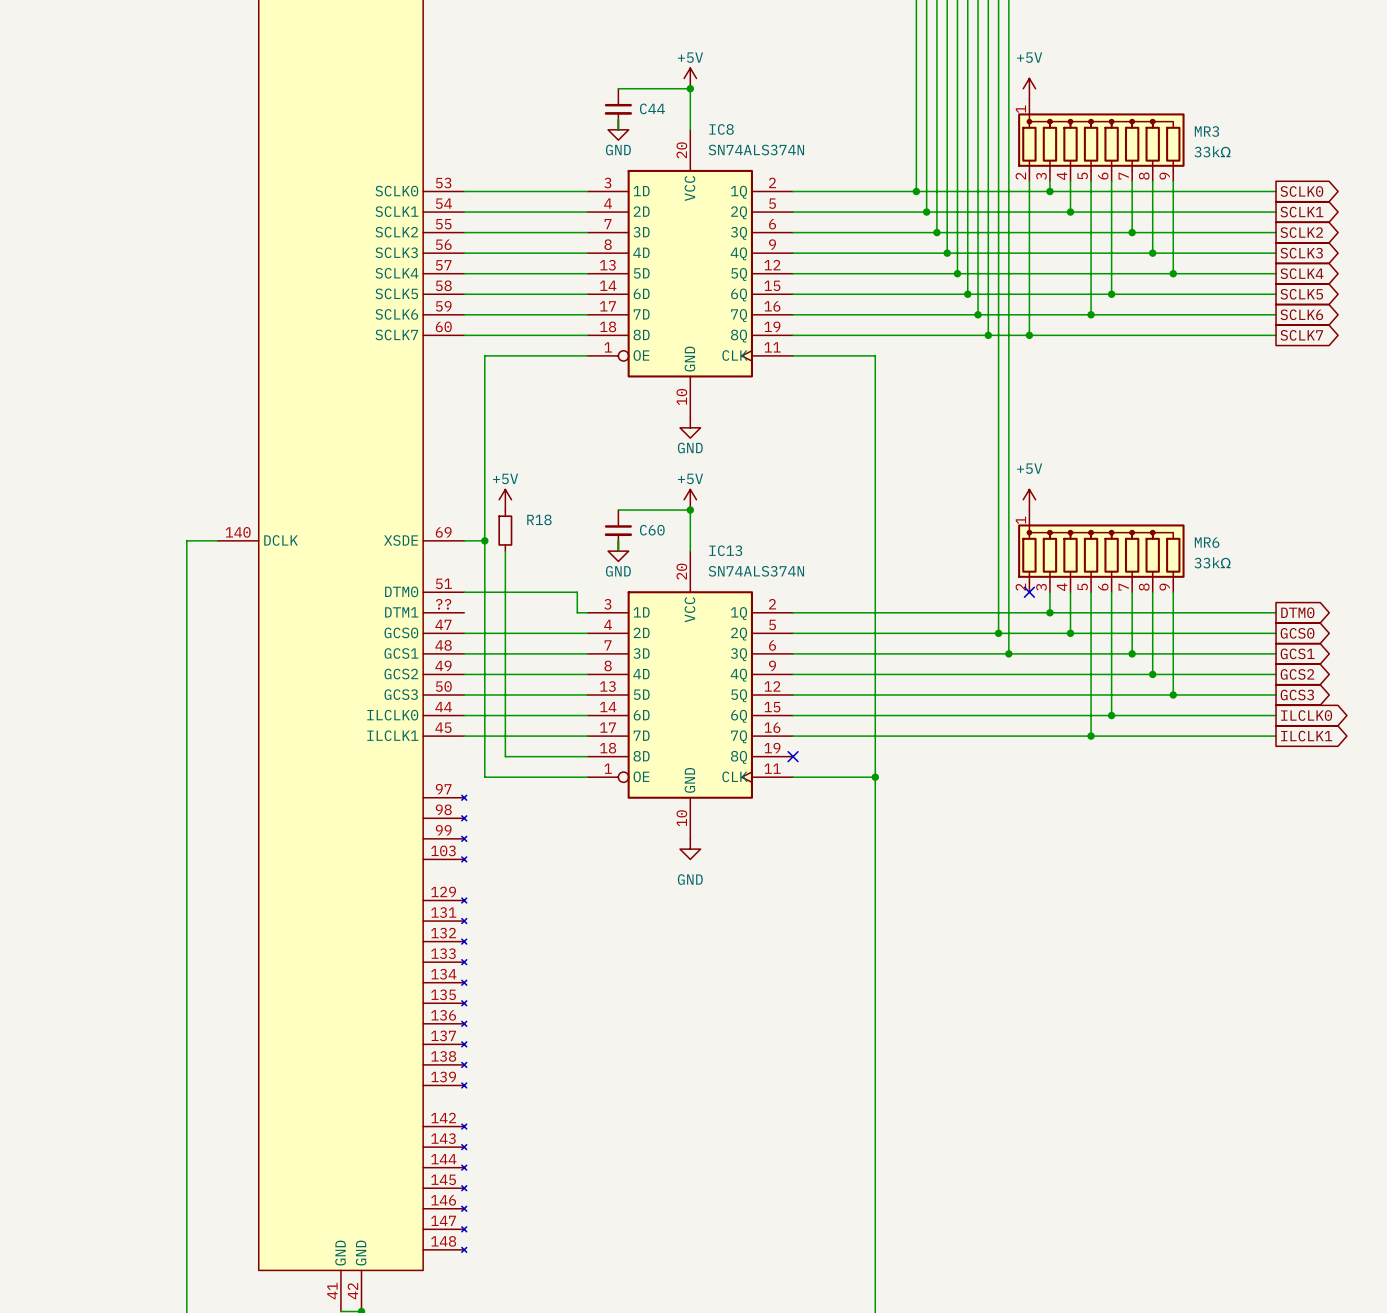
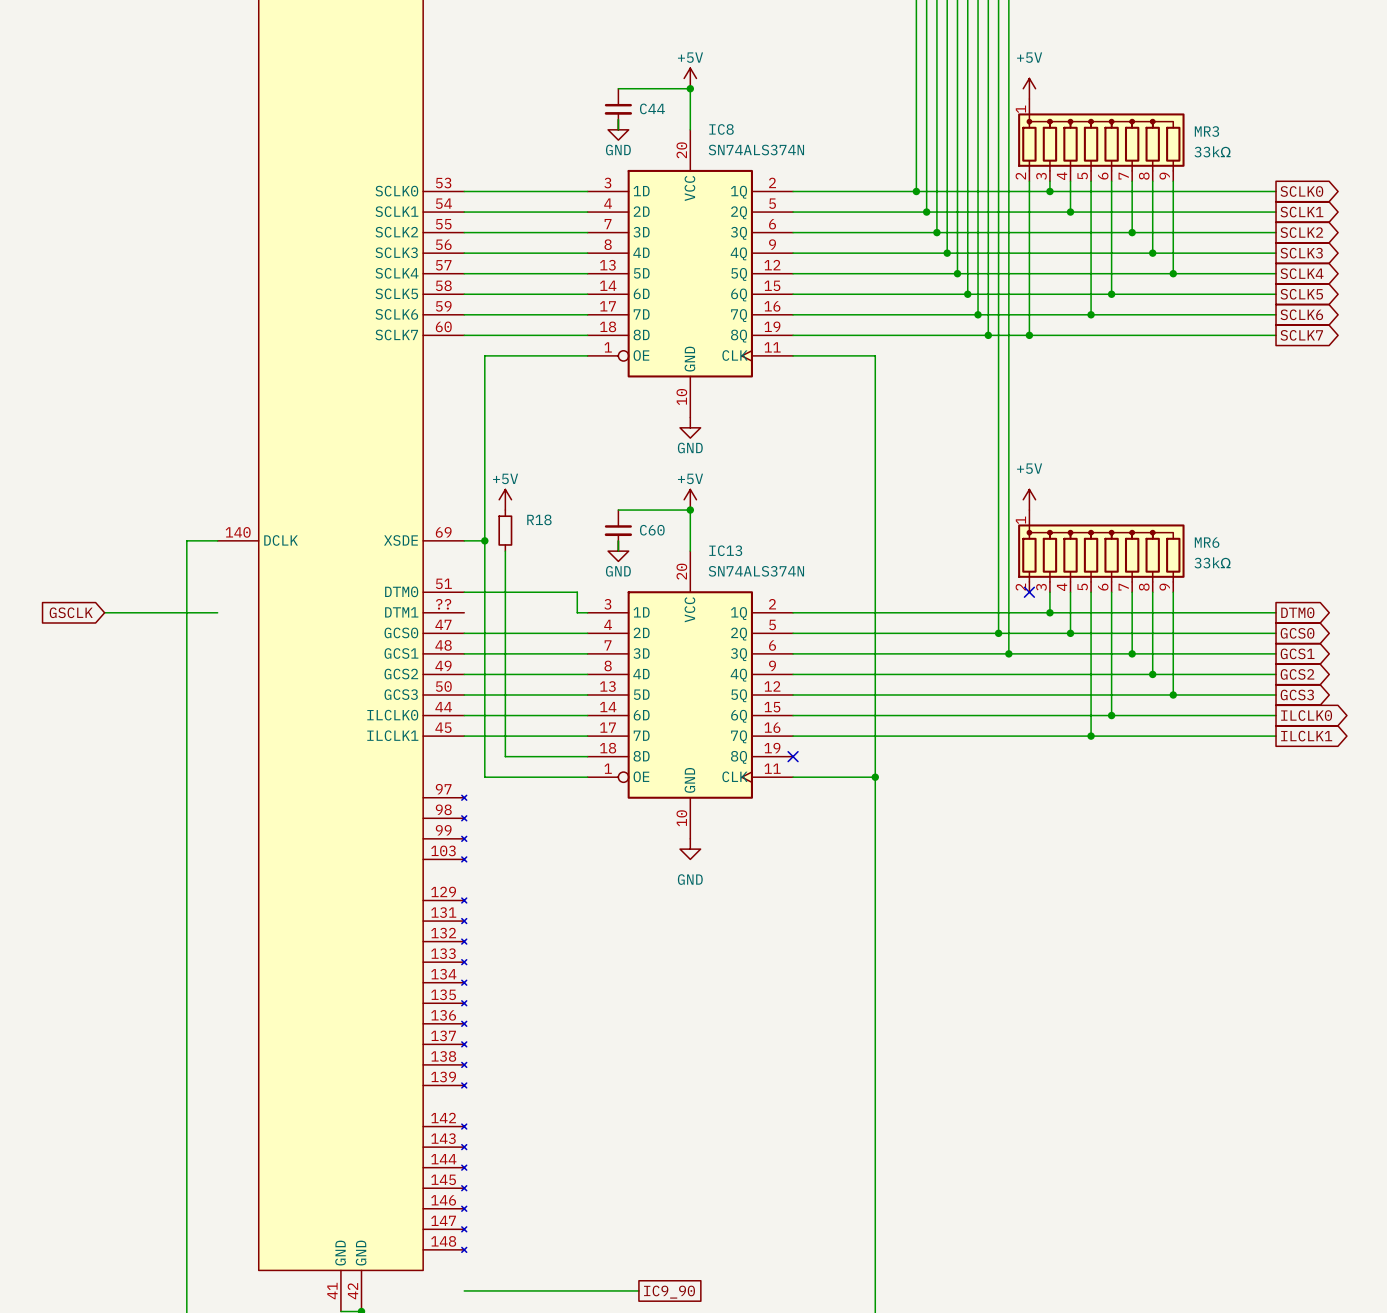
global label: none -> GSCLK (71, 612)
wire: none -> (104, 612) (217, 612)
wire: none -> (464, 1290) (638, 1290)
global label: none -> IC9_90 (669, 1292)

